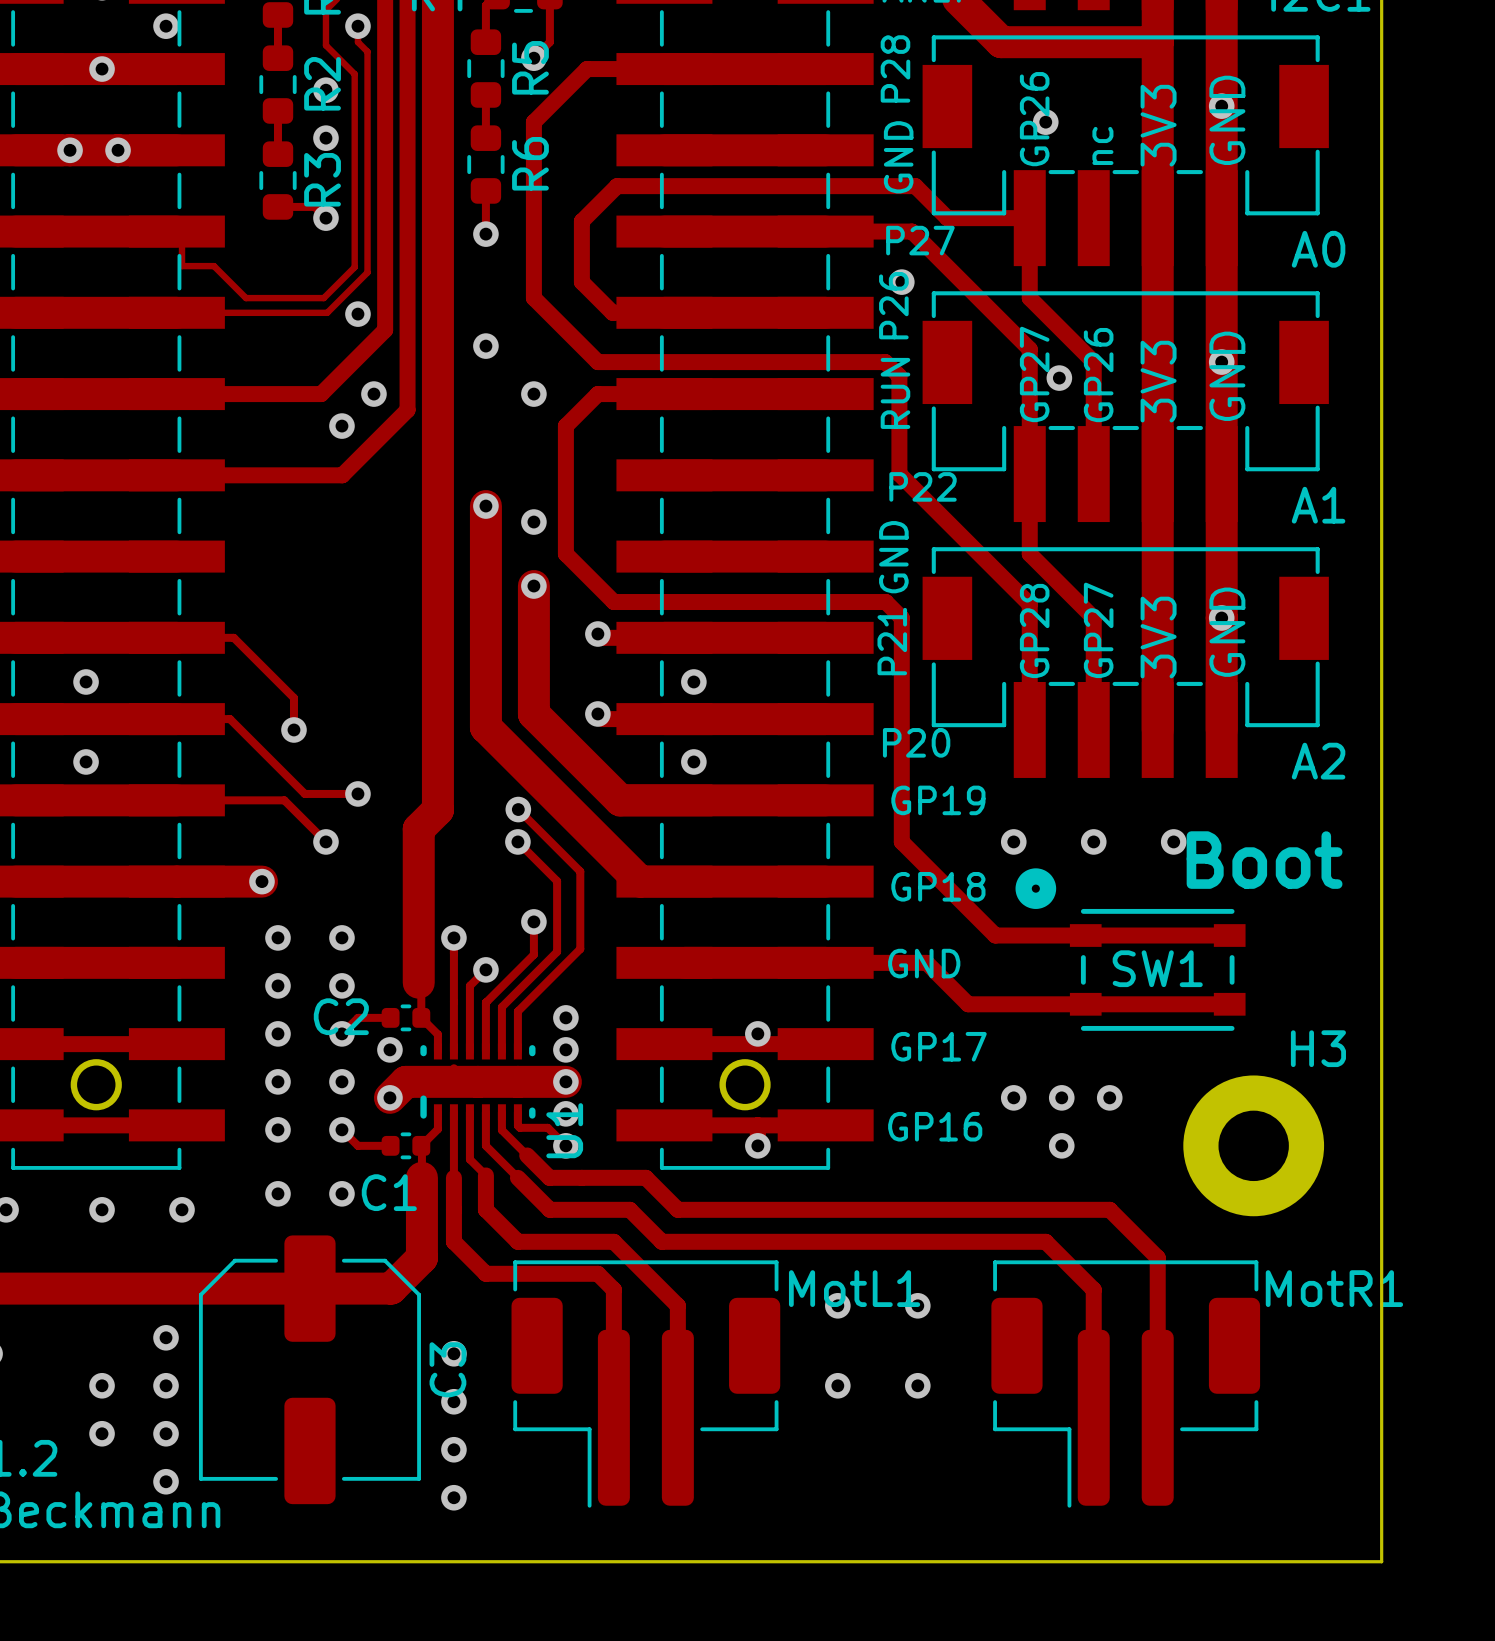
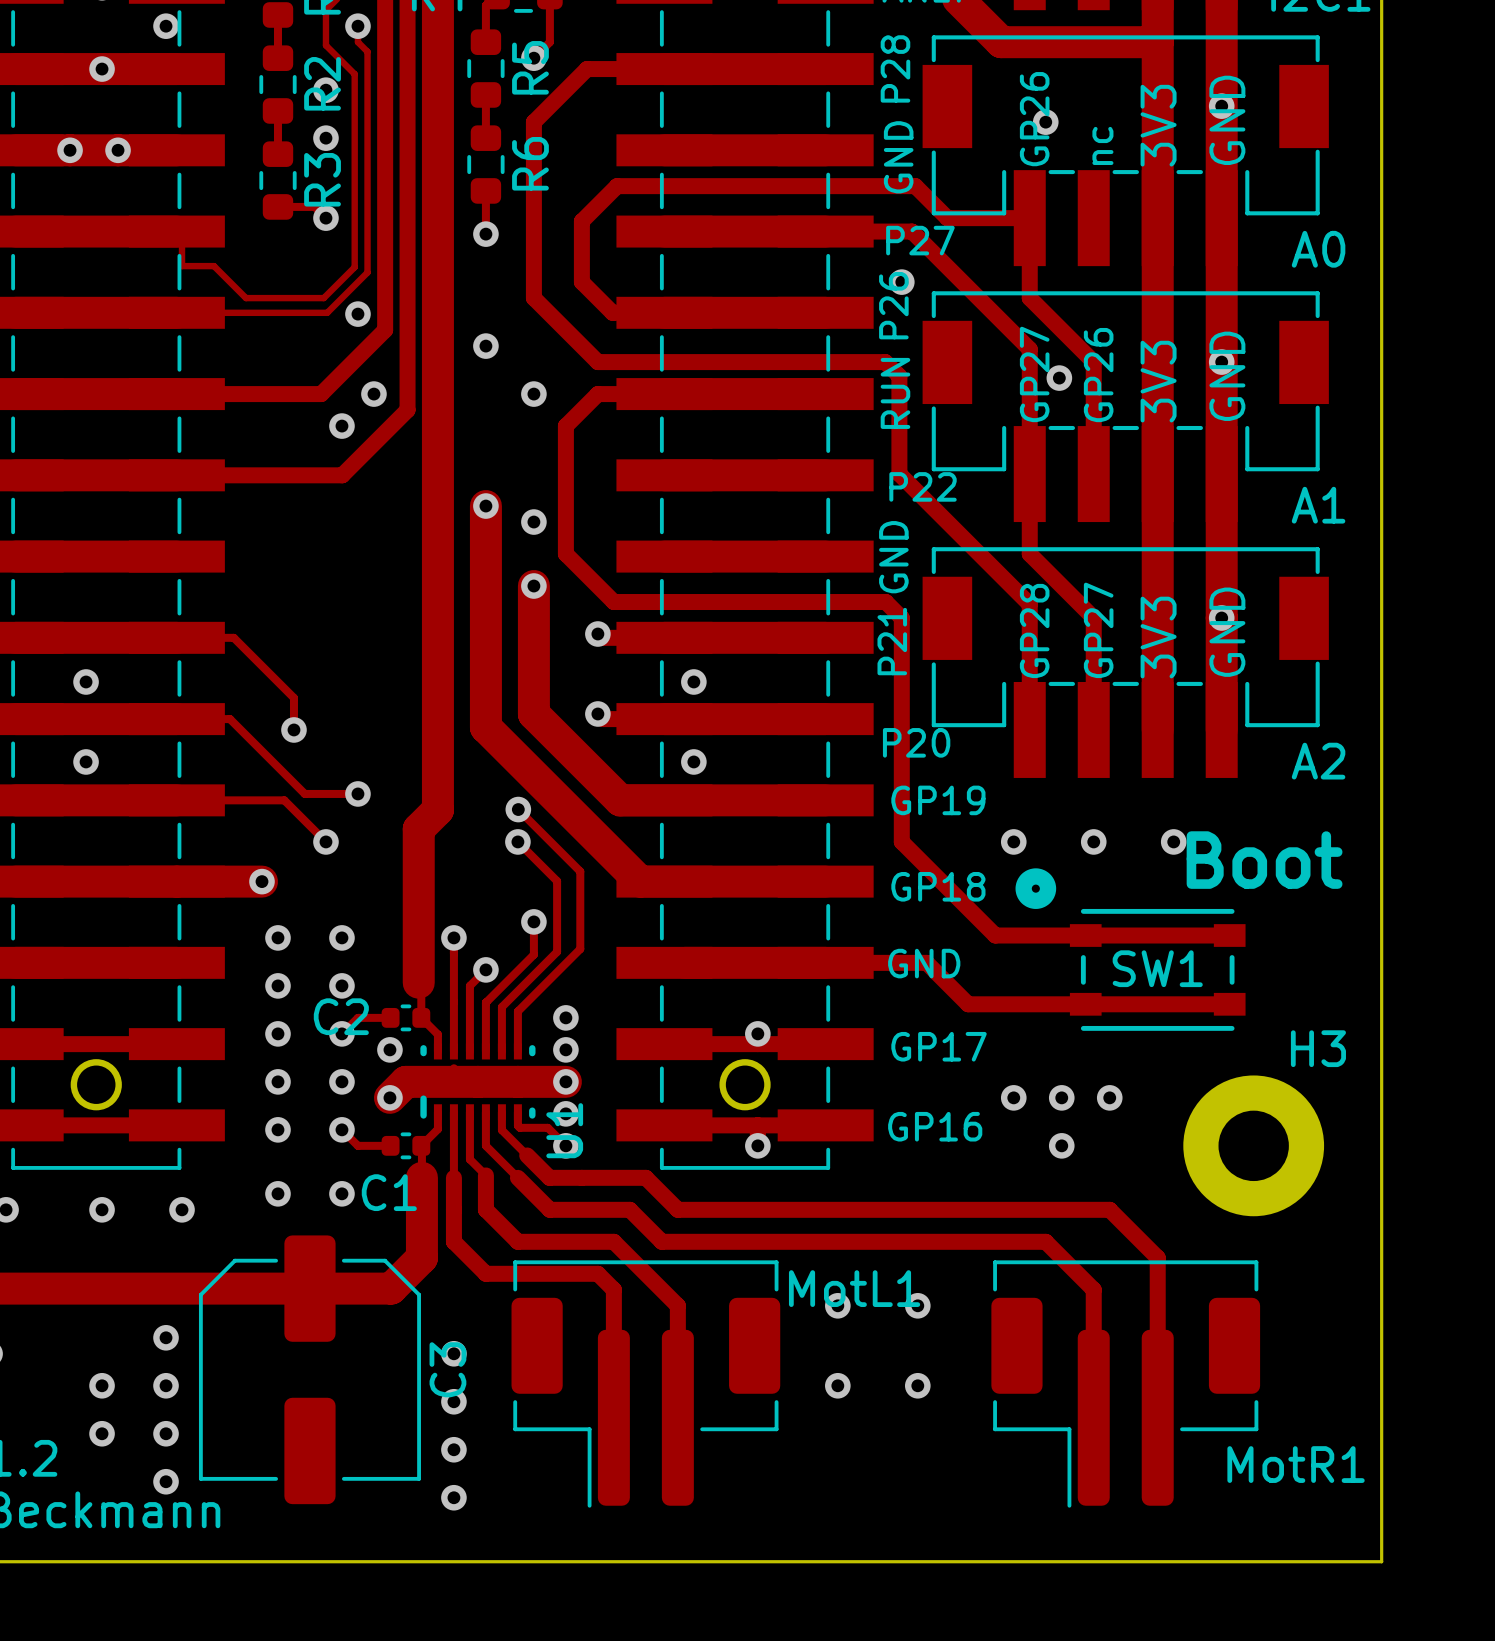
MotR1 name position: MotR1 (1334, 1288) -> MotR1 (1296, 1464)

